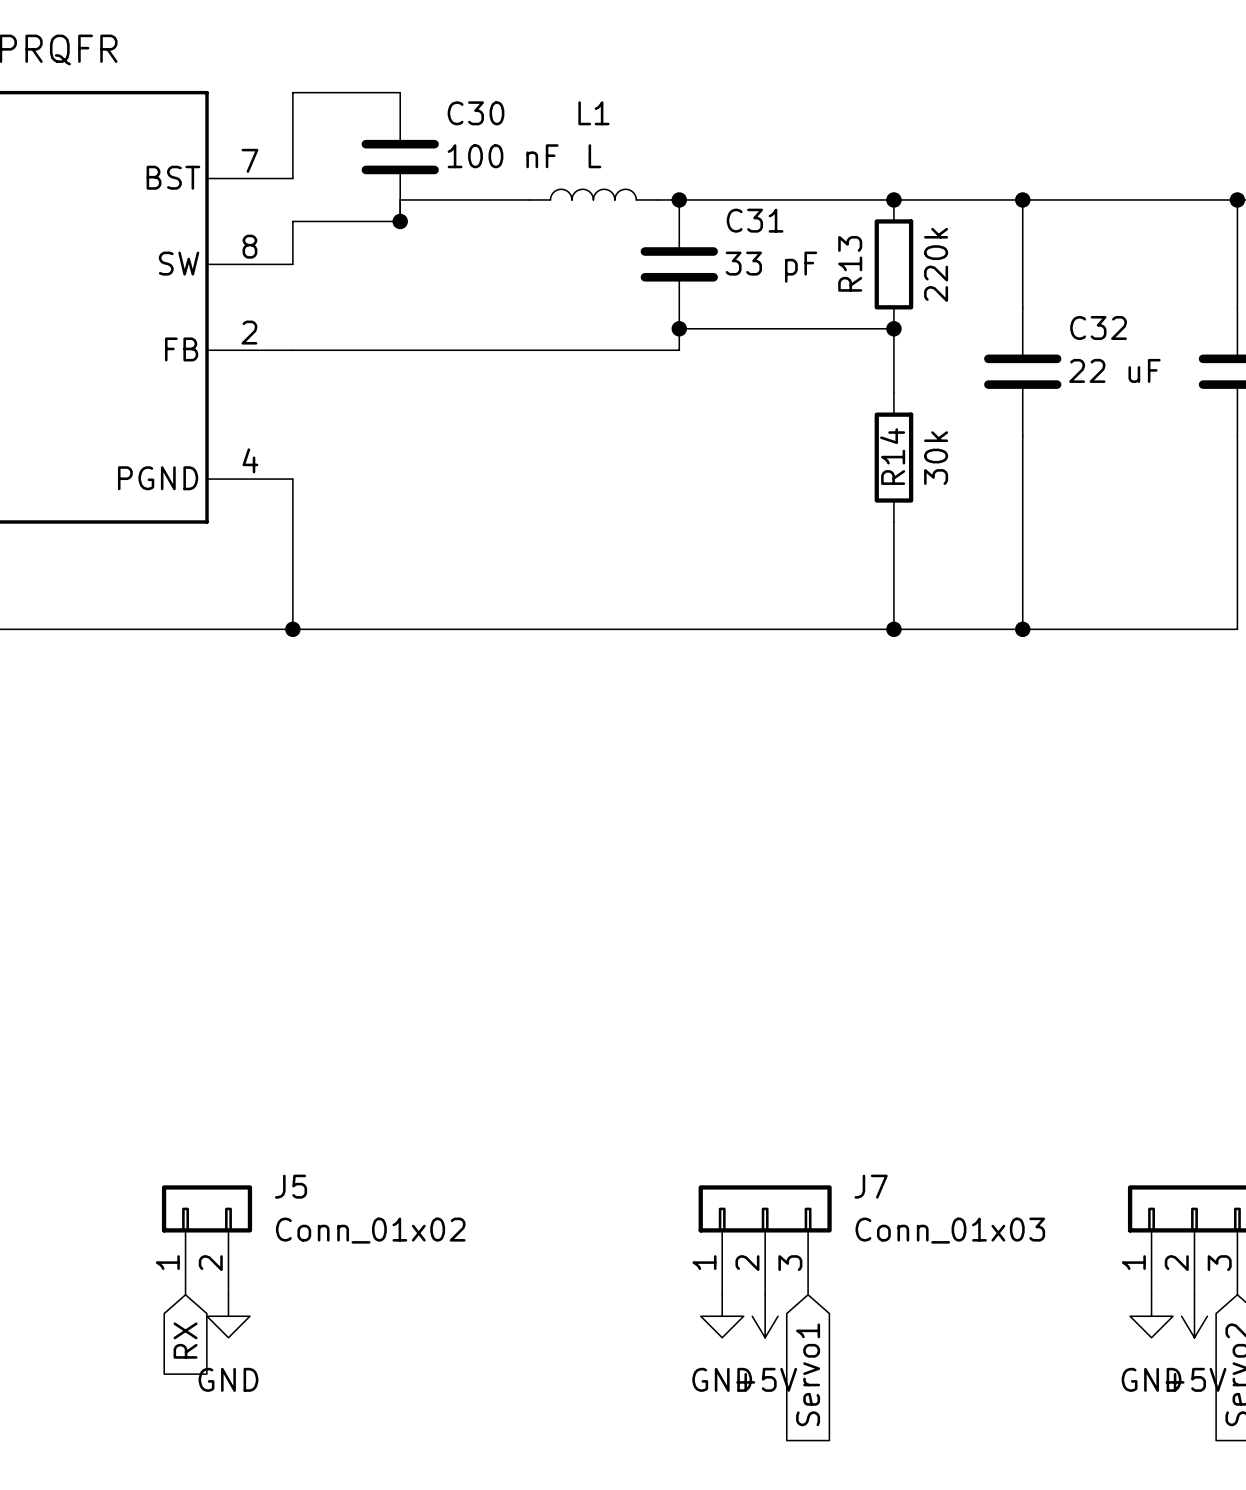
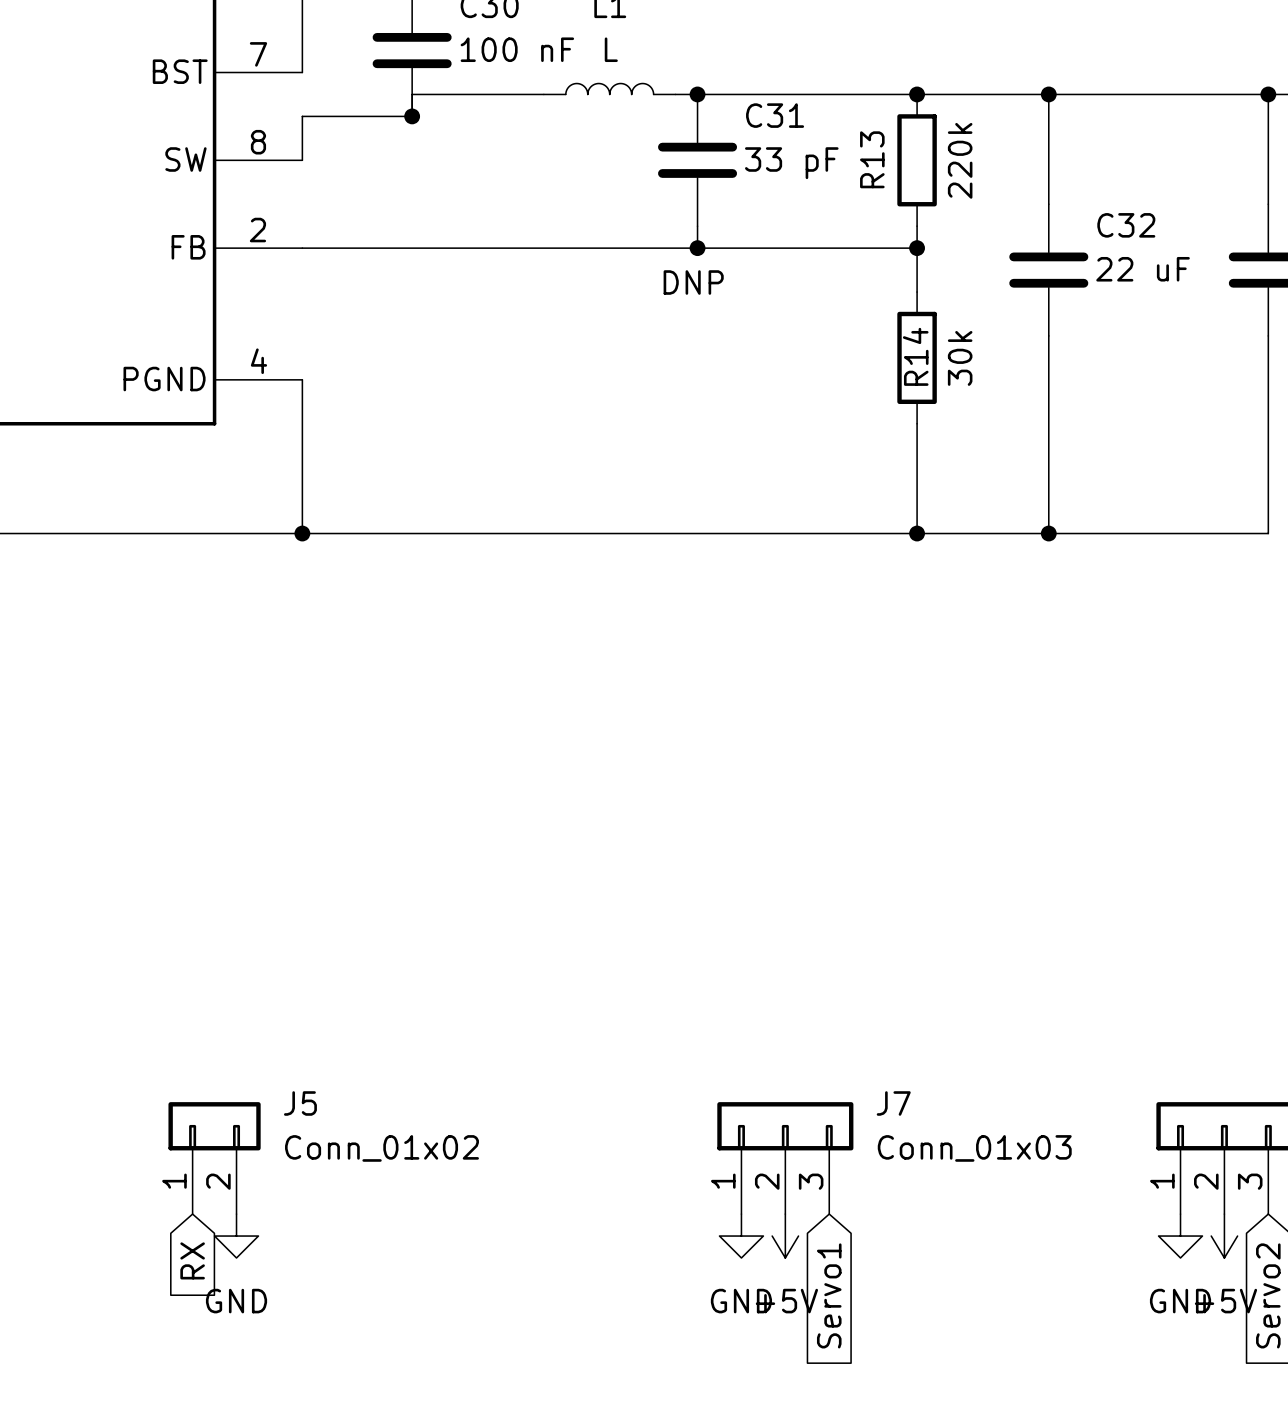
wire: (679, 328) (893, 328) -> (697, 248) (917, 248)
junction position: (679, 328) -> (697, 248)
junction position: (893, 328) -> (917, 248)
text: none -> DNP (693, 282)

